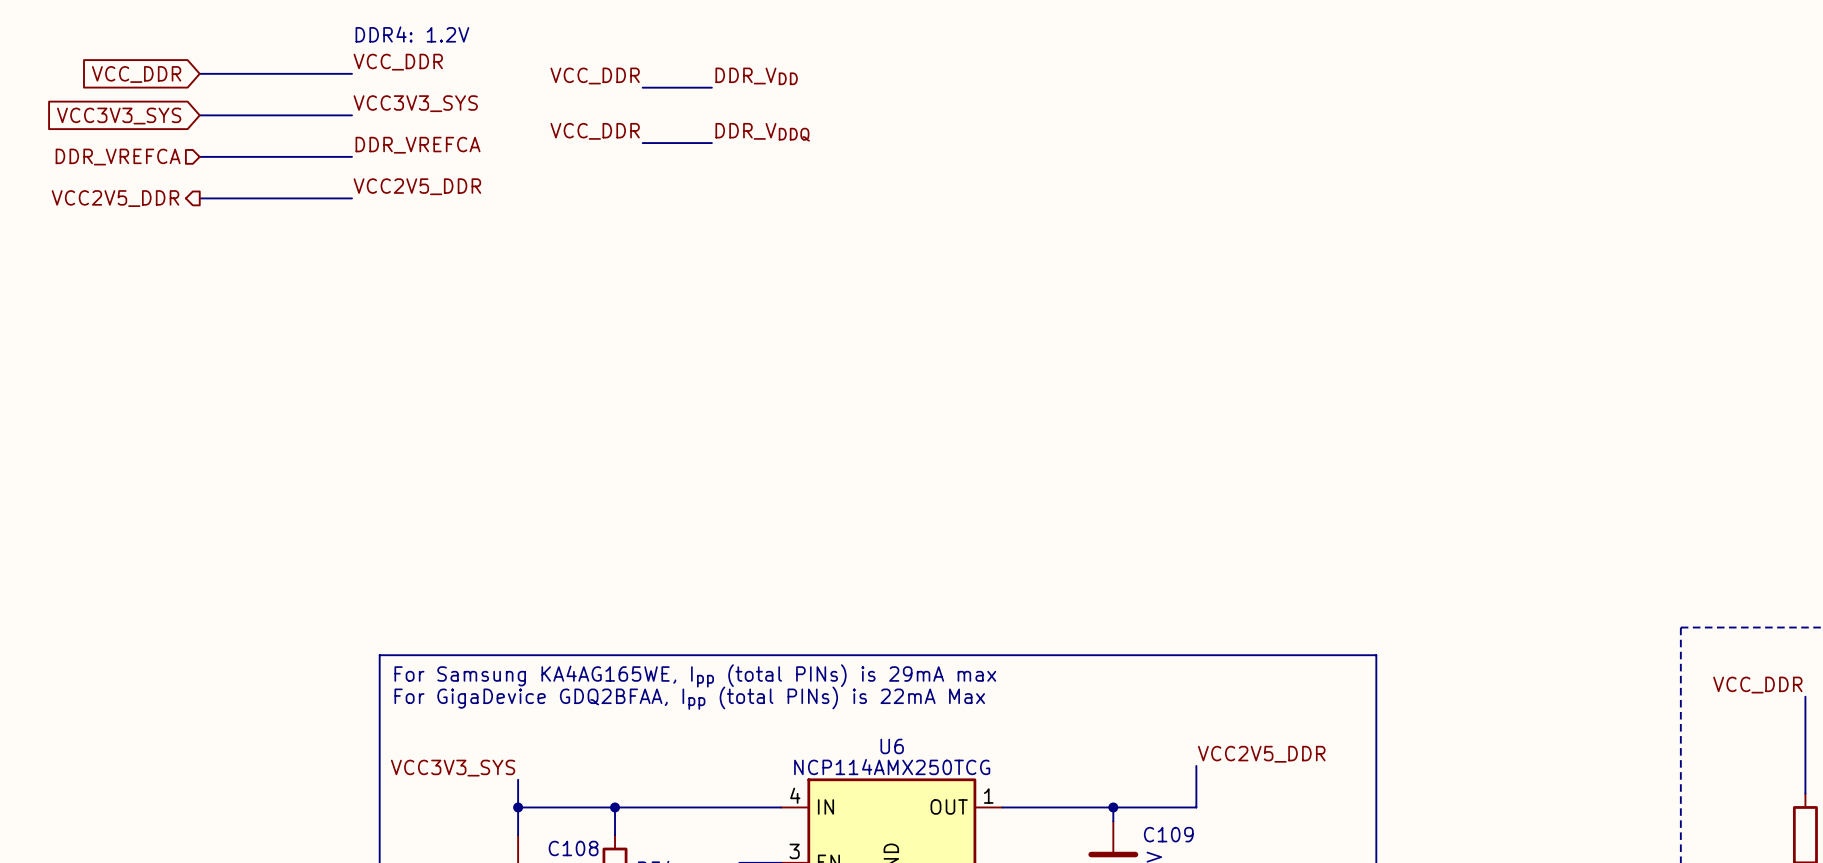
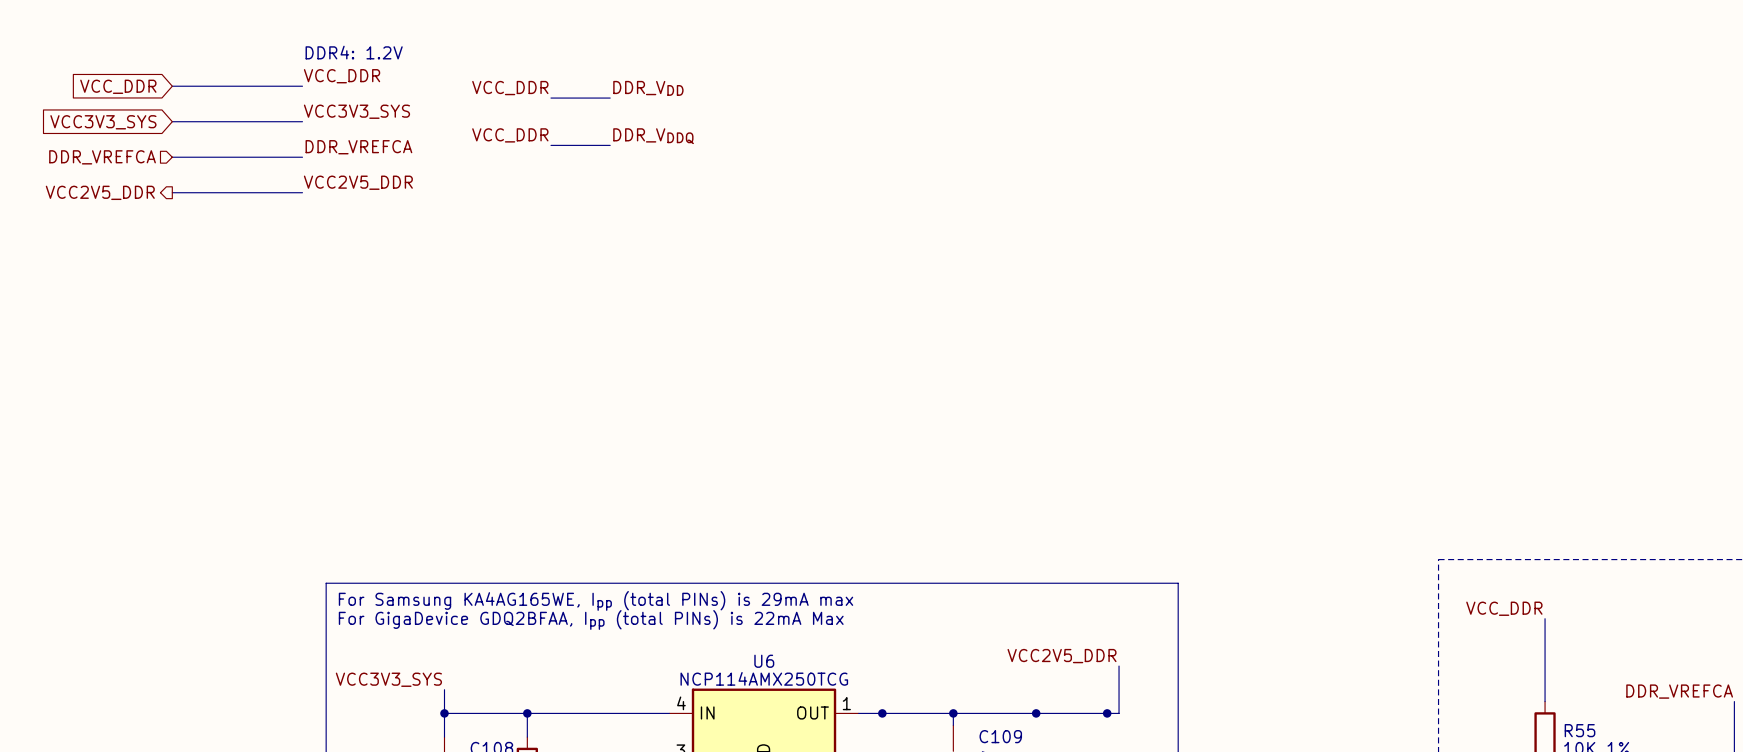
label position: VCC2V5_DDR (1261, 754) -> VCC2V5_DDR (1062, 656)
wire: (1196, 765) (1196, 807) -> (1119, 666) (1119, 713) (1024, 713)
junction: none -> (882, 713)
junction: none -> (1036, 713)
junction: none -> (1107, 713)

